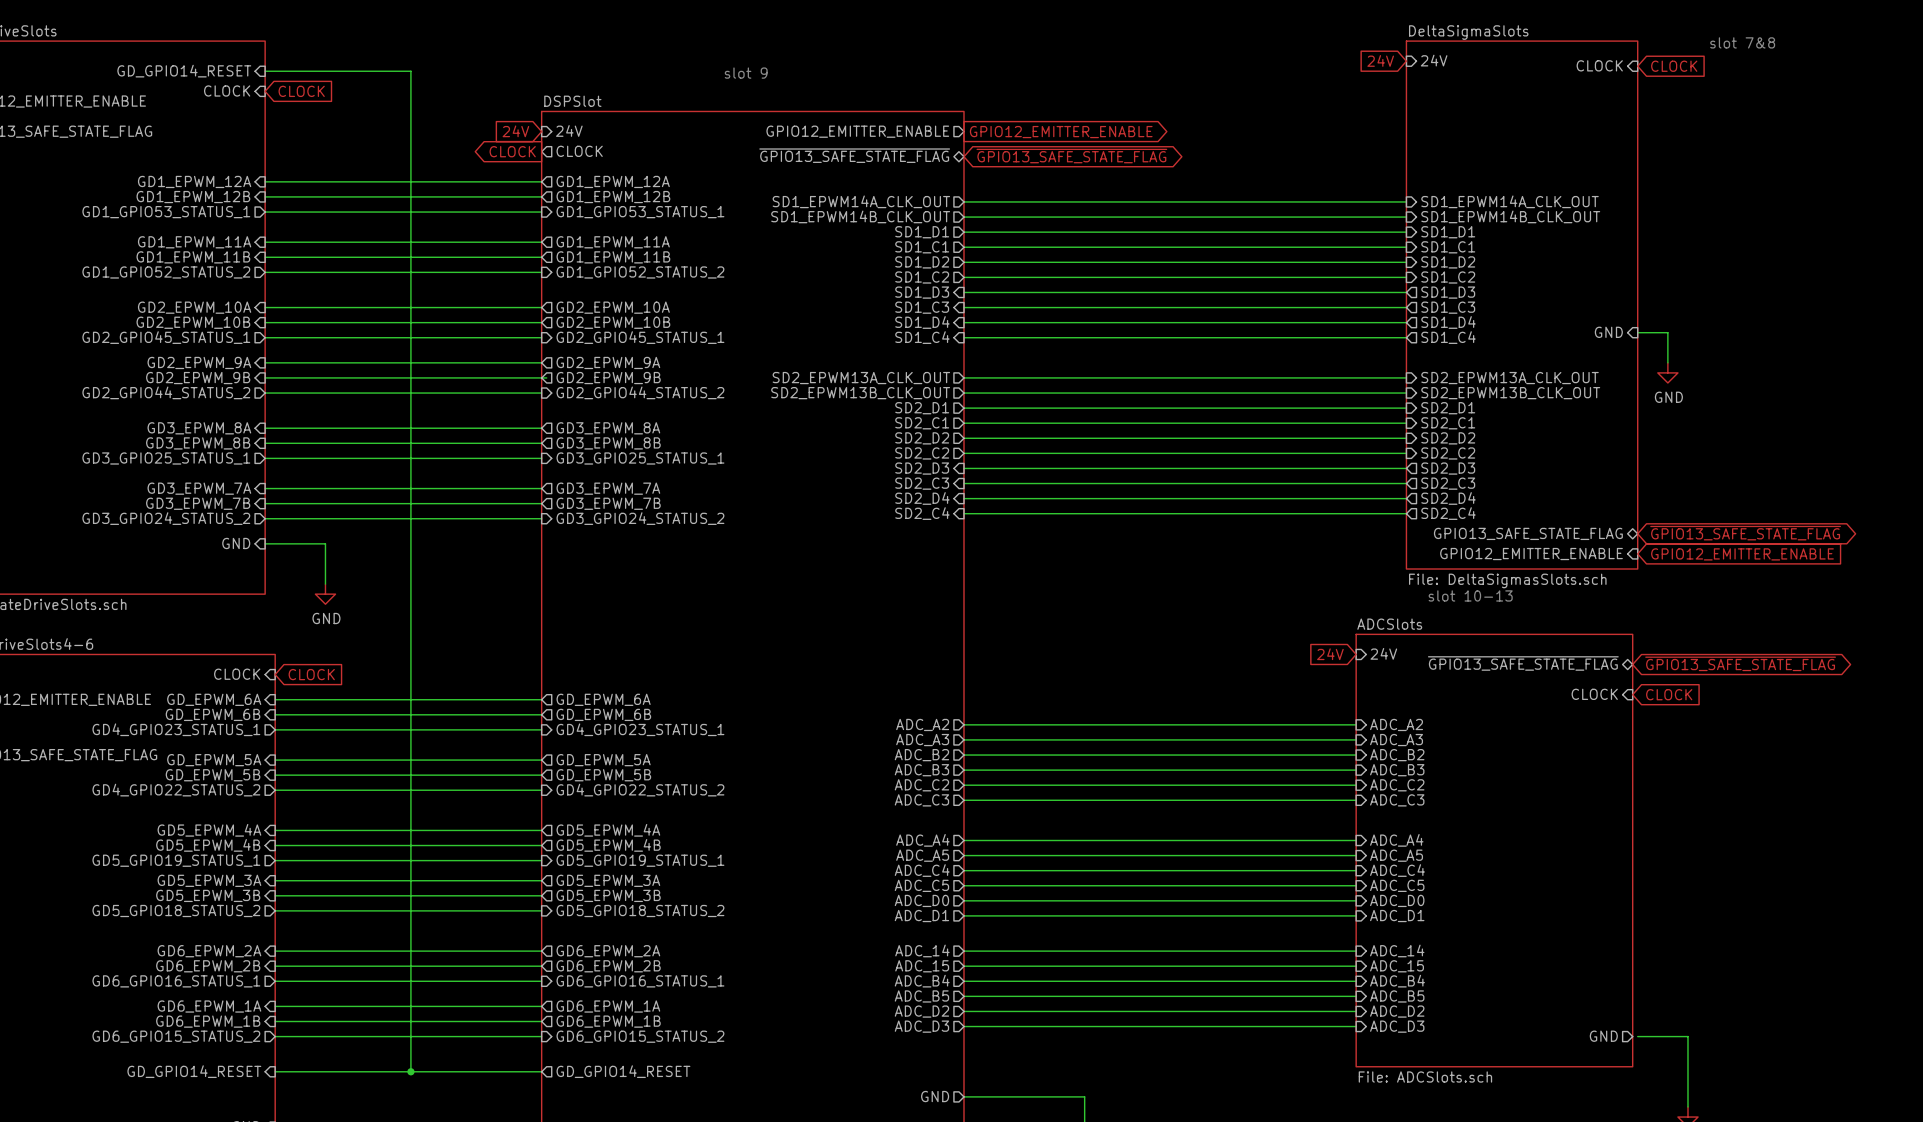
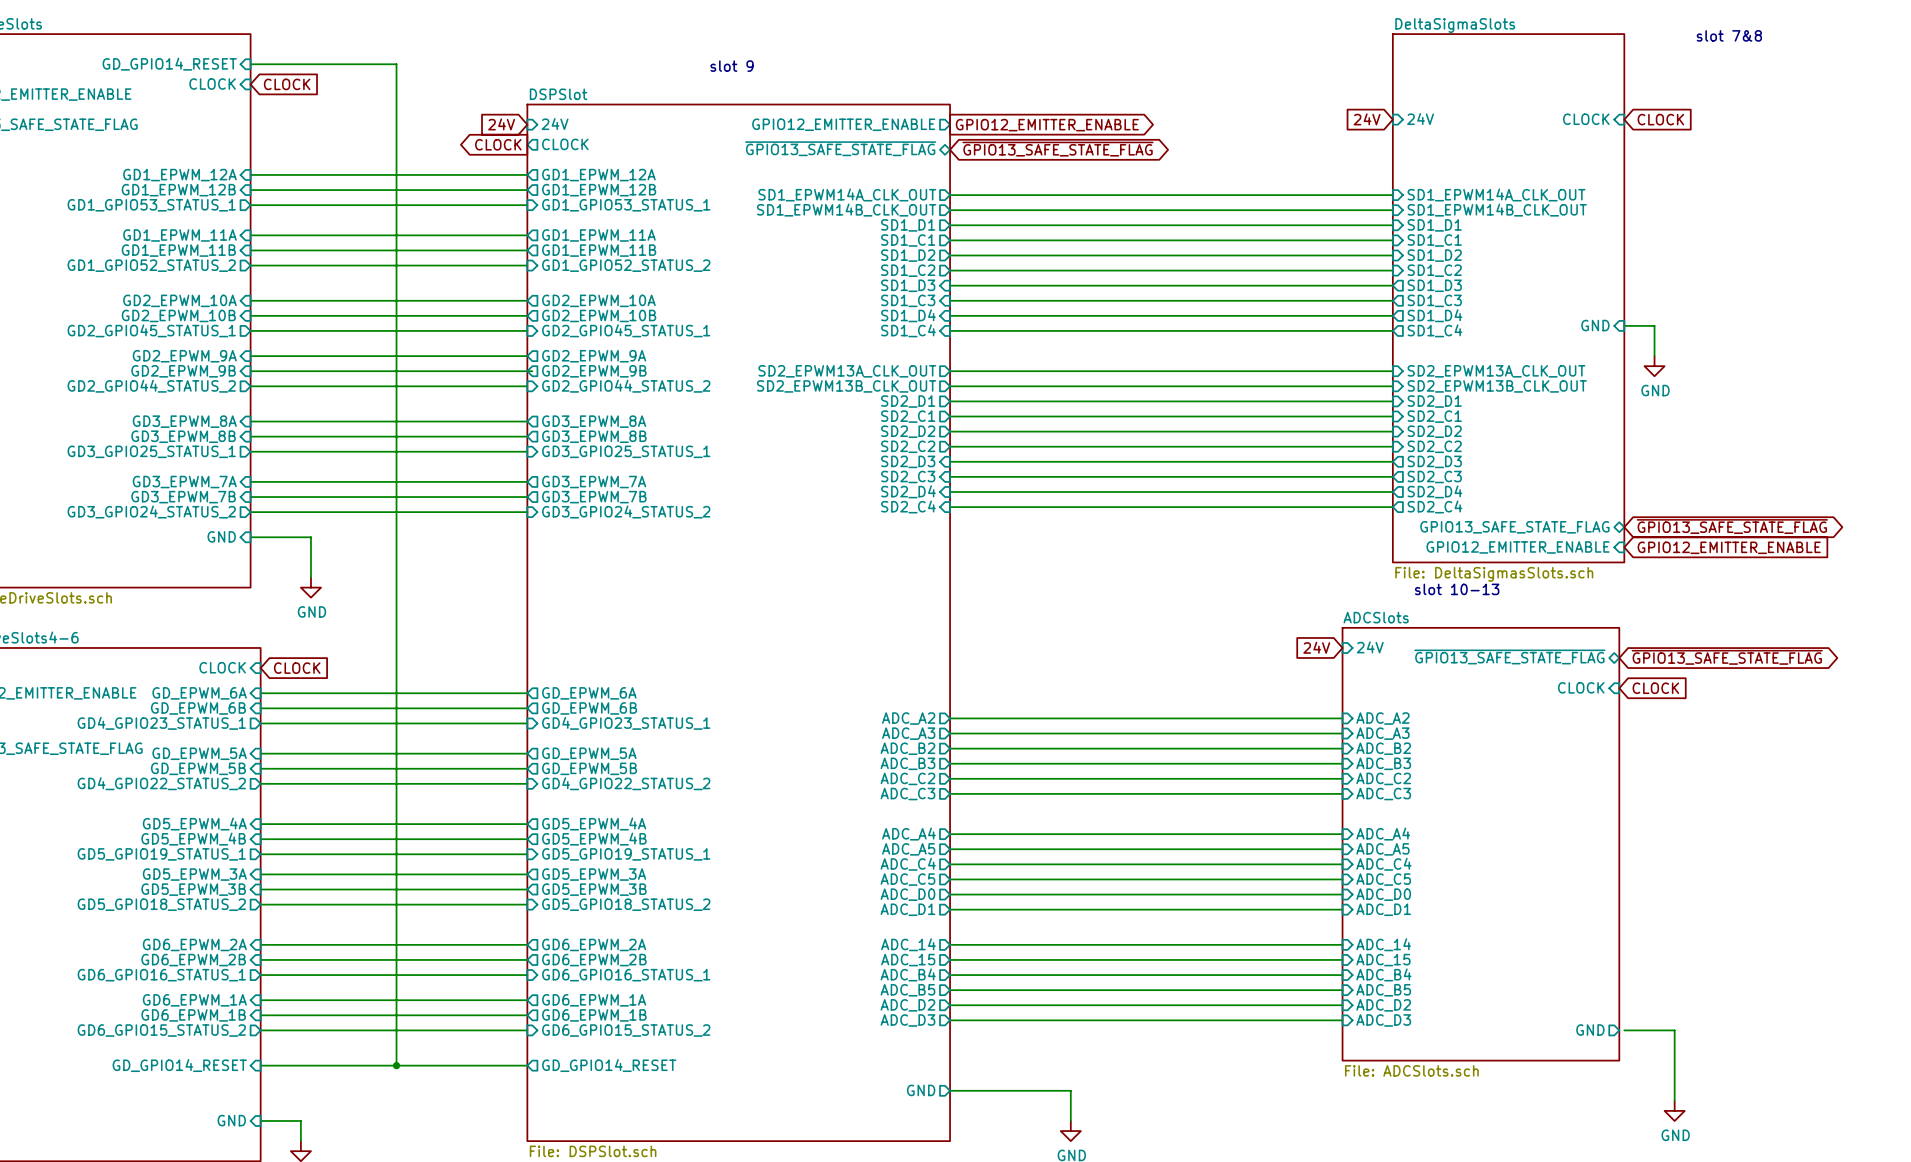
global label position: 24V (1380, 60) -> 24V (1367, 119)
sheet pin position: 24V (1434, 60) -> 24V (1420, 119)
sheet pin position: CLOCK (1599, 65) -> CLOCK (1586, 119)
global label position: CLOCK (1674, 66) -> CLOCK (1660, 119)

